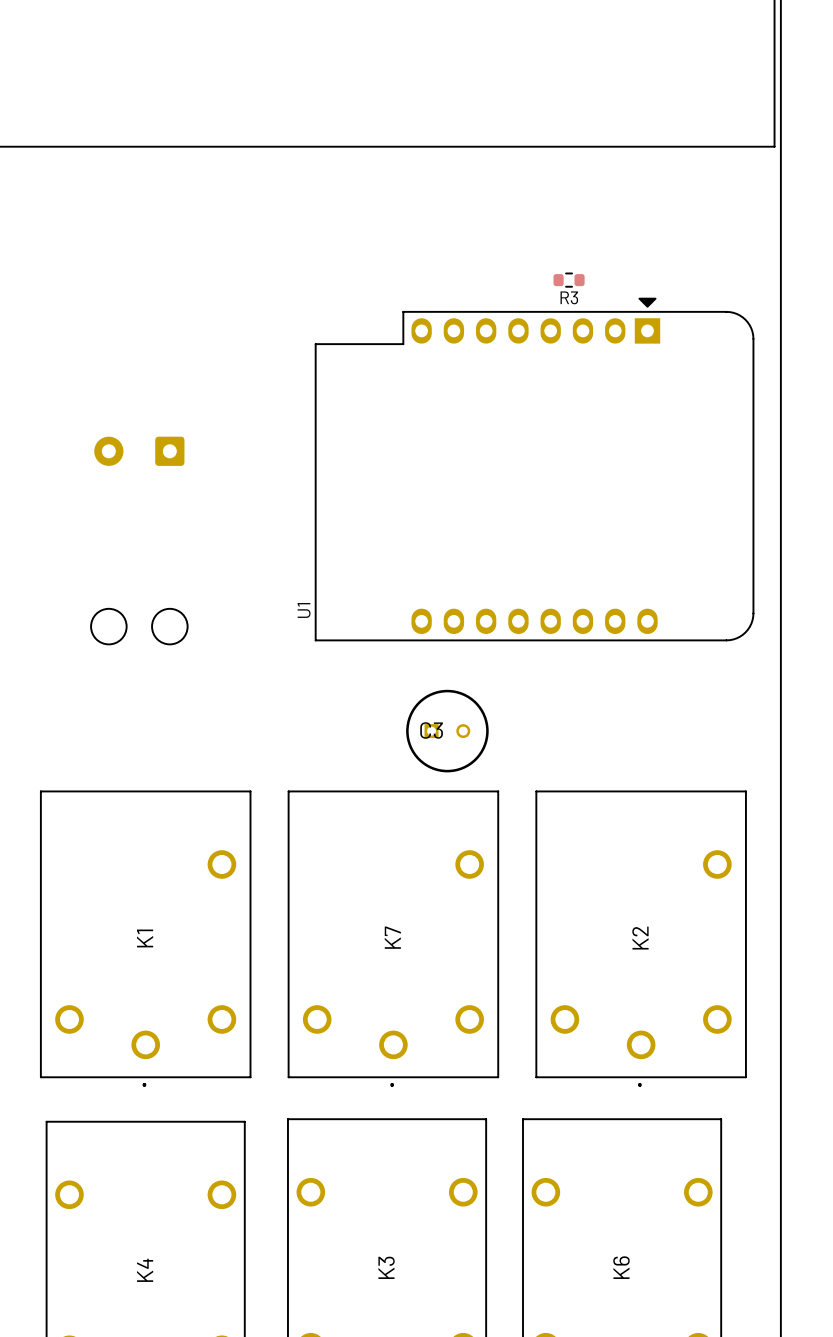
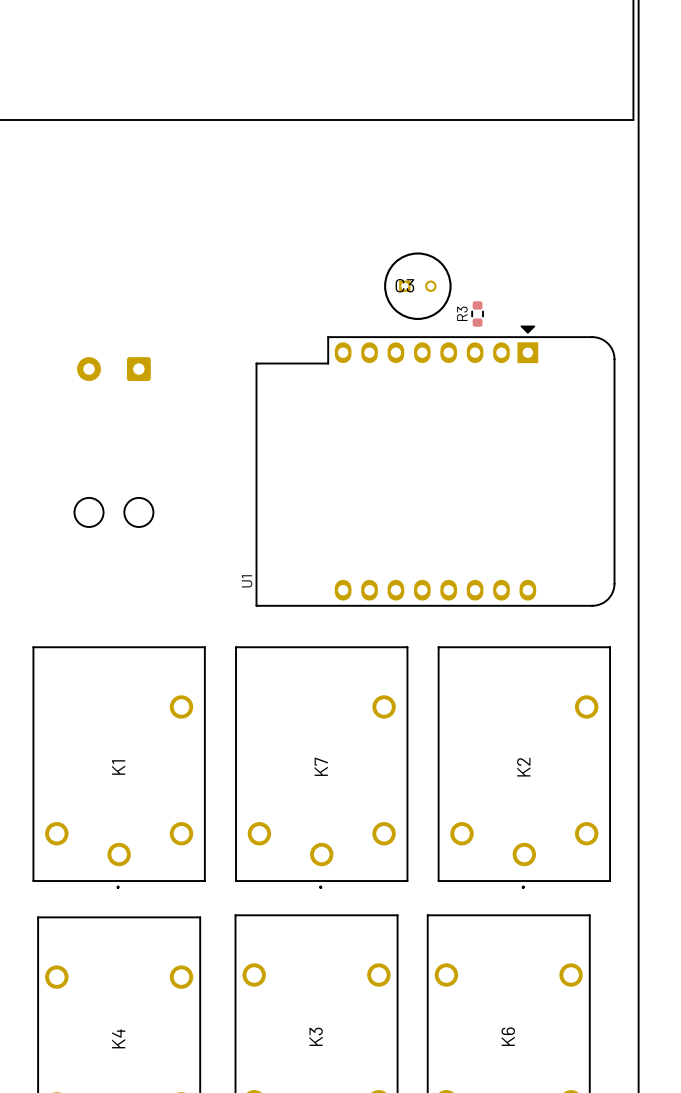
R3 rotation: 0° (569, 280) -> 90° clockwise (477, 314)
R3 position: (569, 280) -> (477, 314)
U1 position: (534, 469) -> (435, 465)
C3 position: (447, 731) -> (417, 286)

